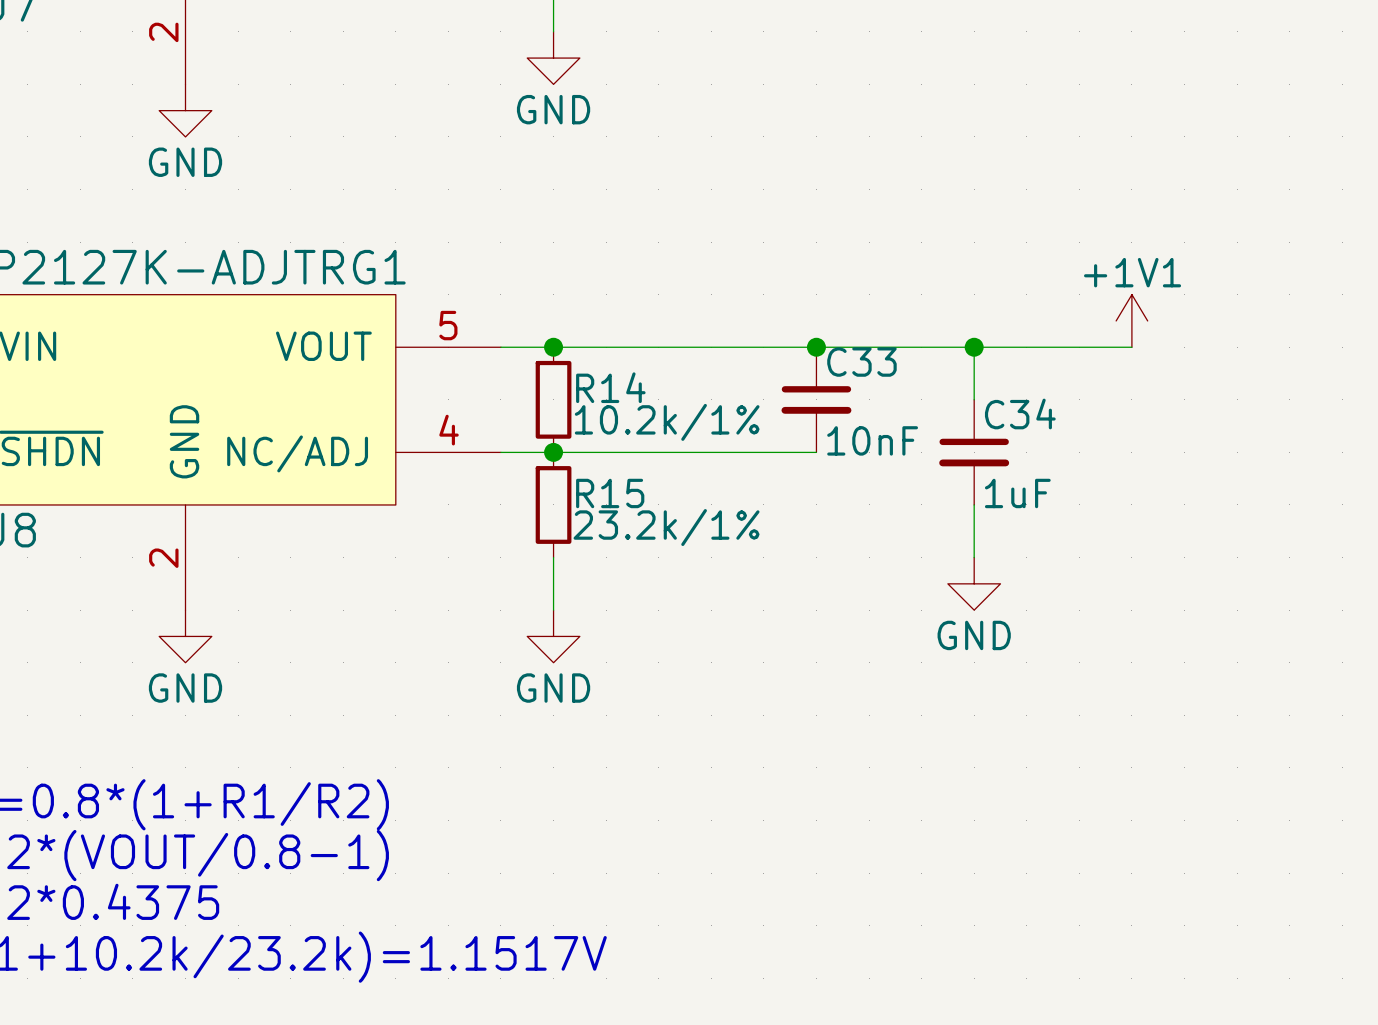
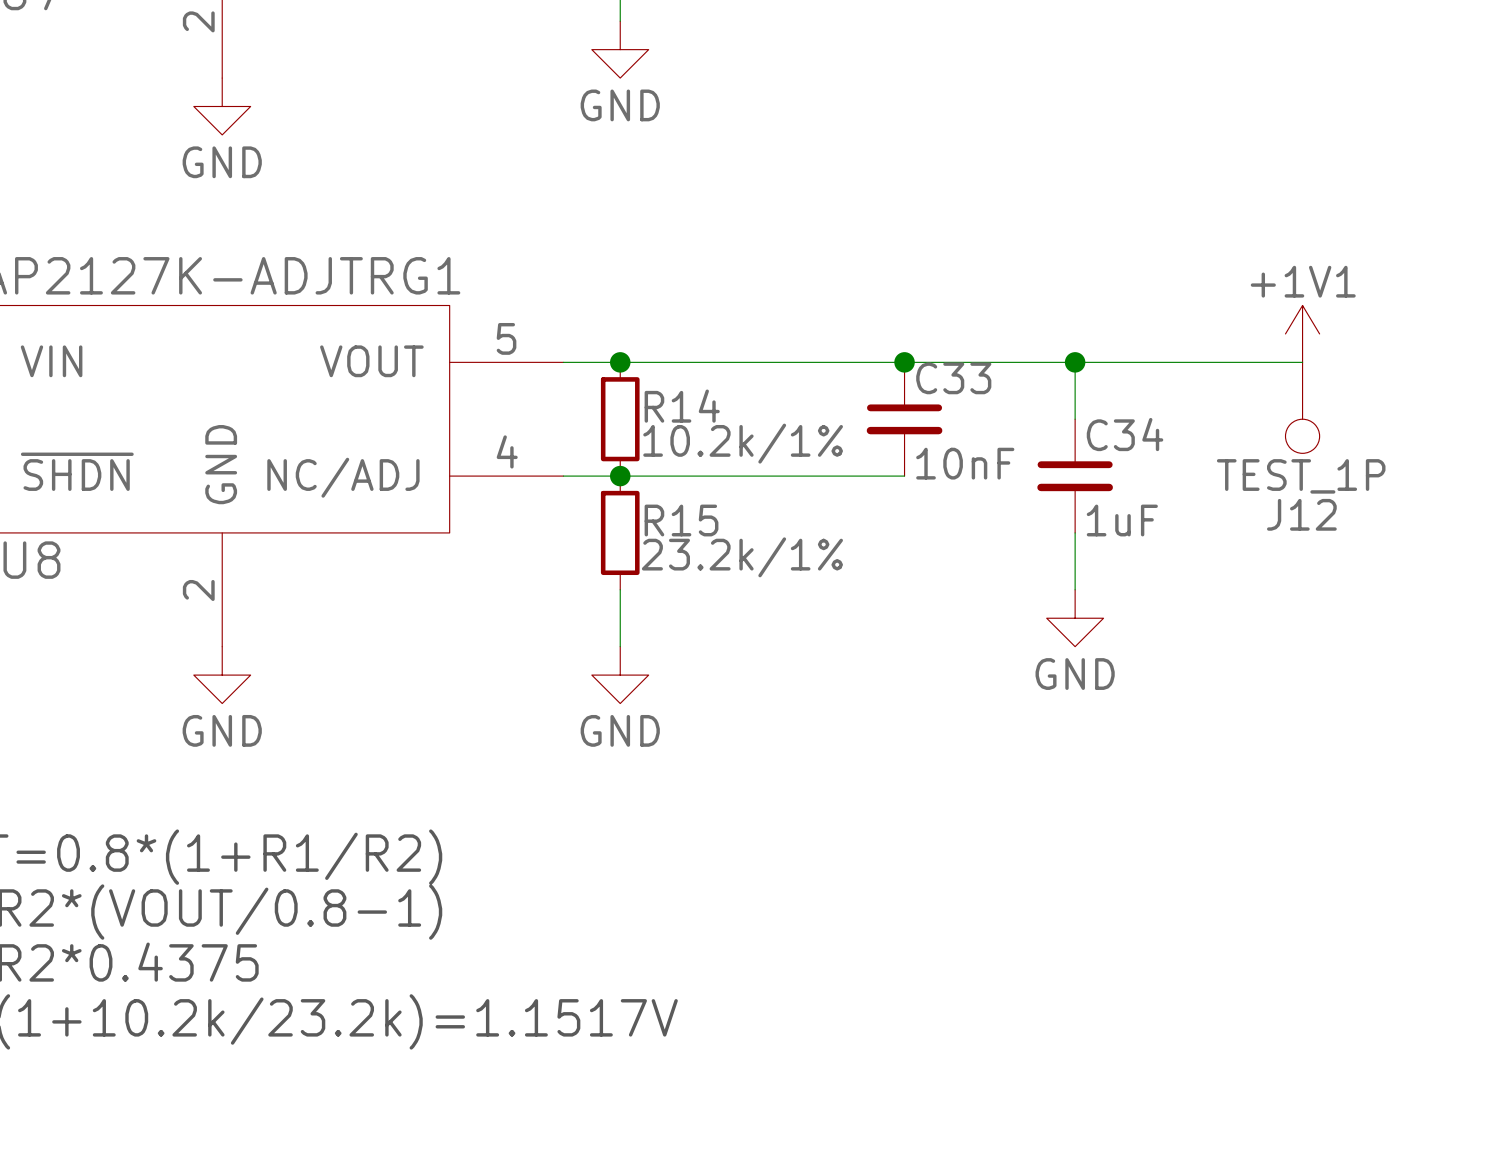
power symbol position: +1V1 (1131, 320) -> +1V1 (1302, 333)
wire: none -> (1245, 362) (1302, 362)
J12: none -> TEST_1P (1302, 407)

